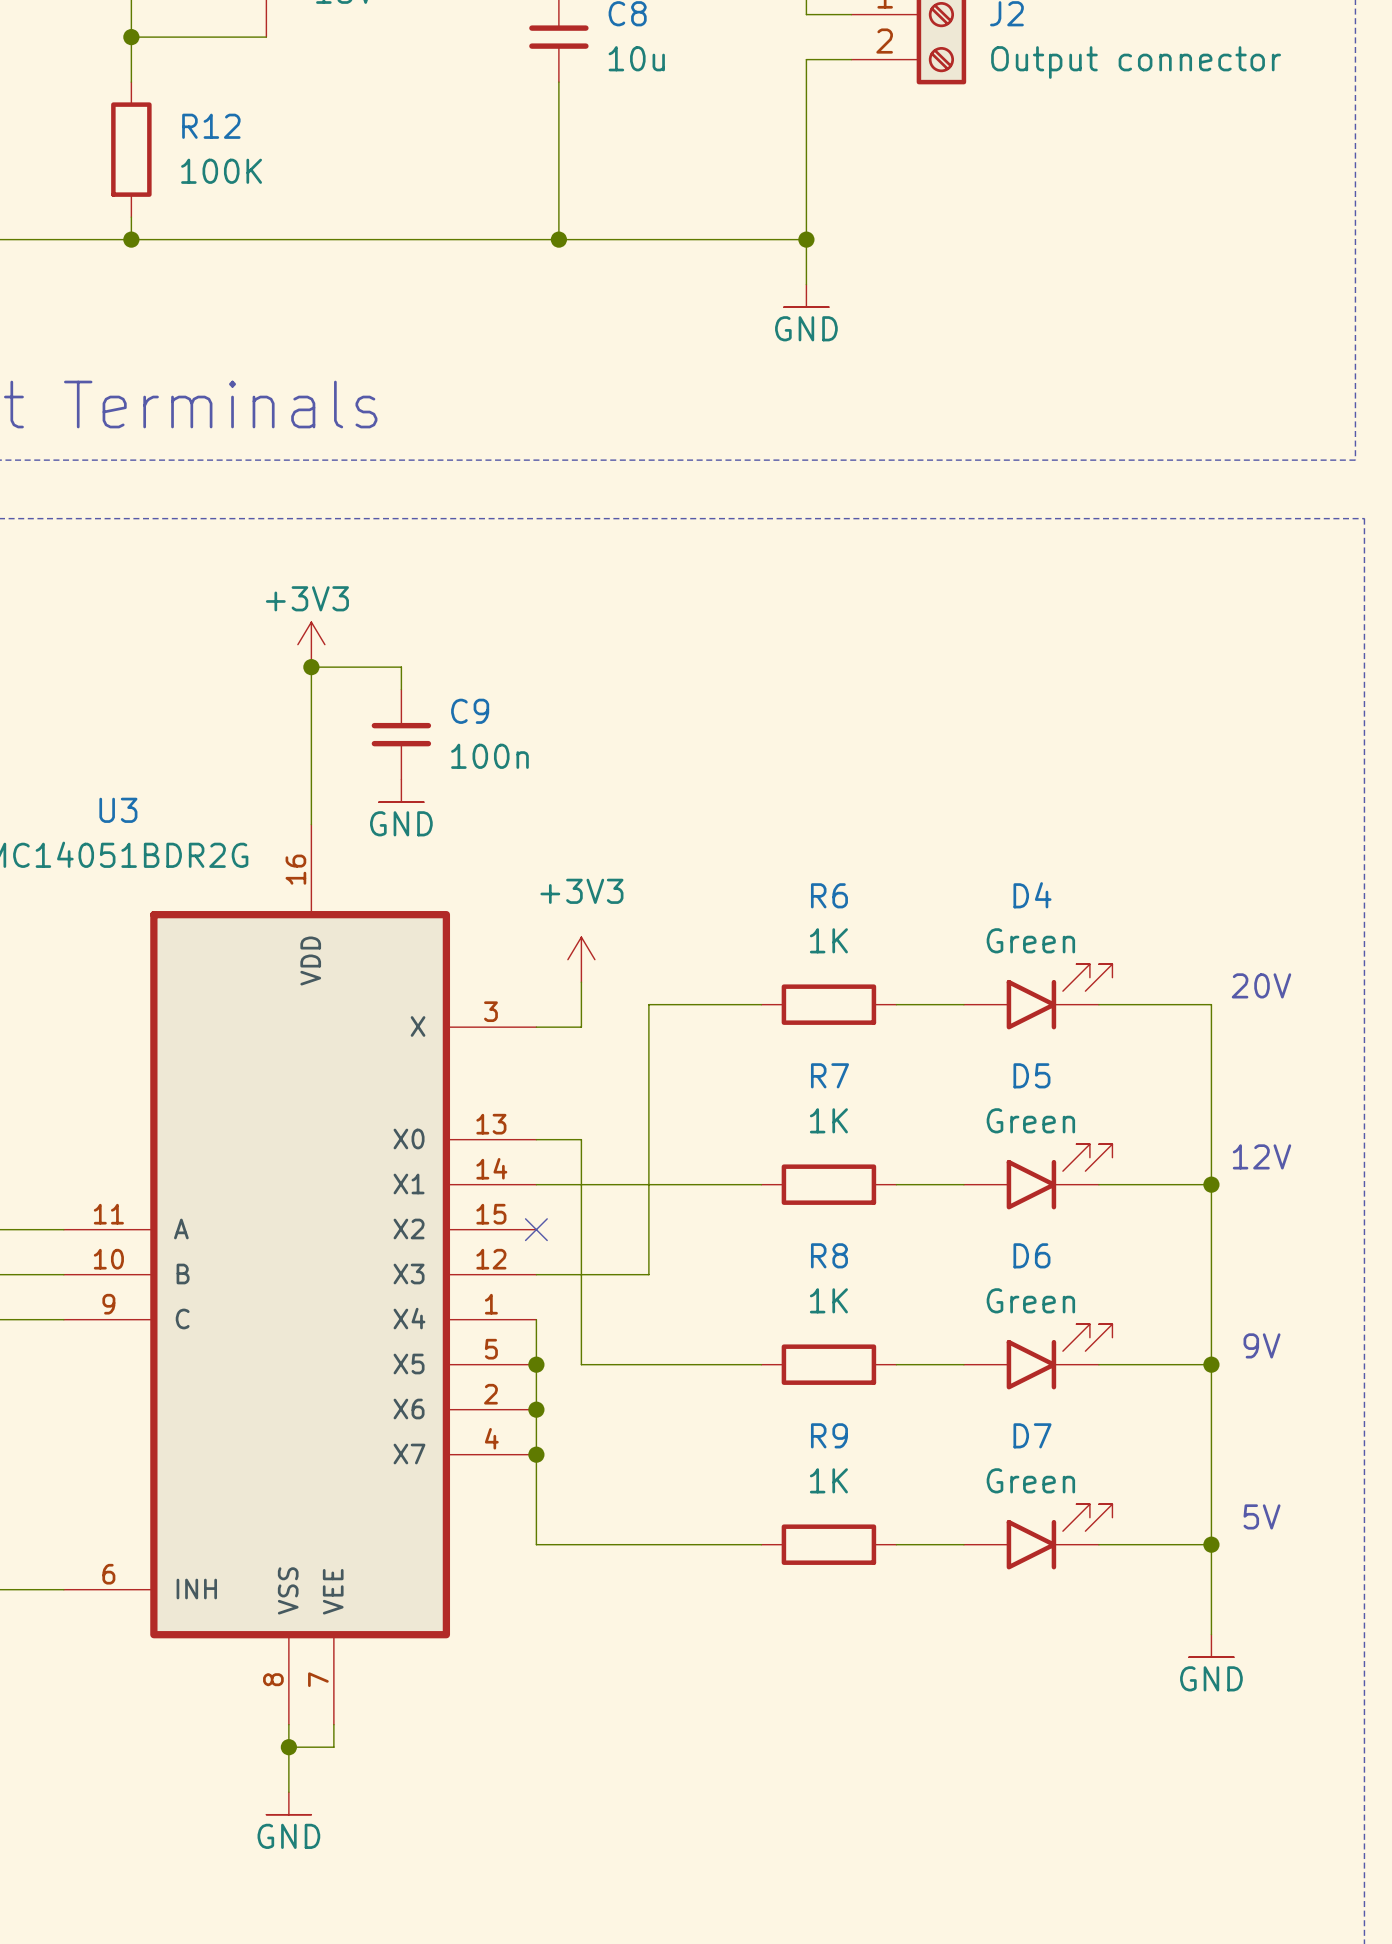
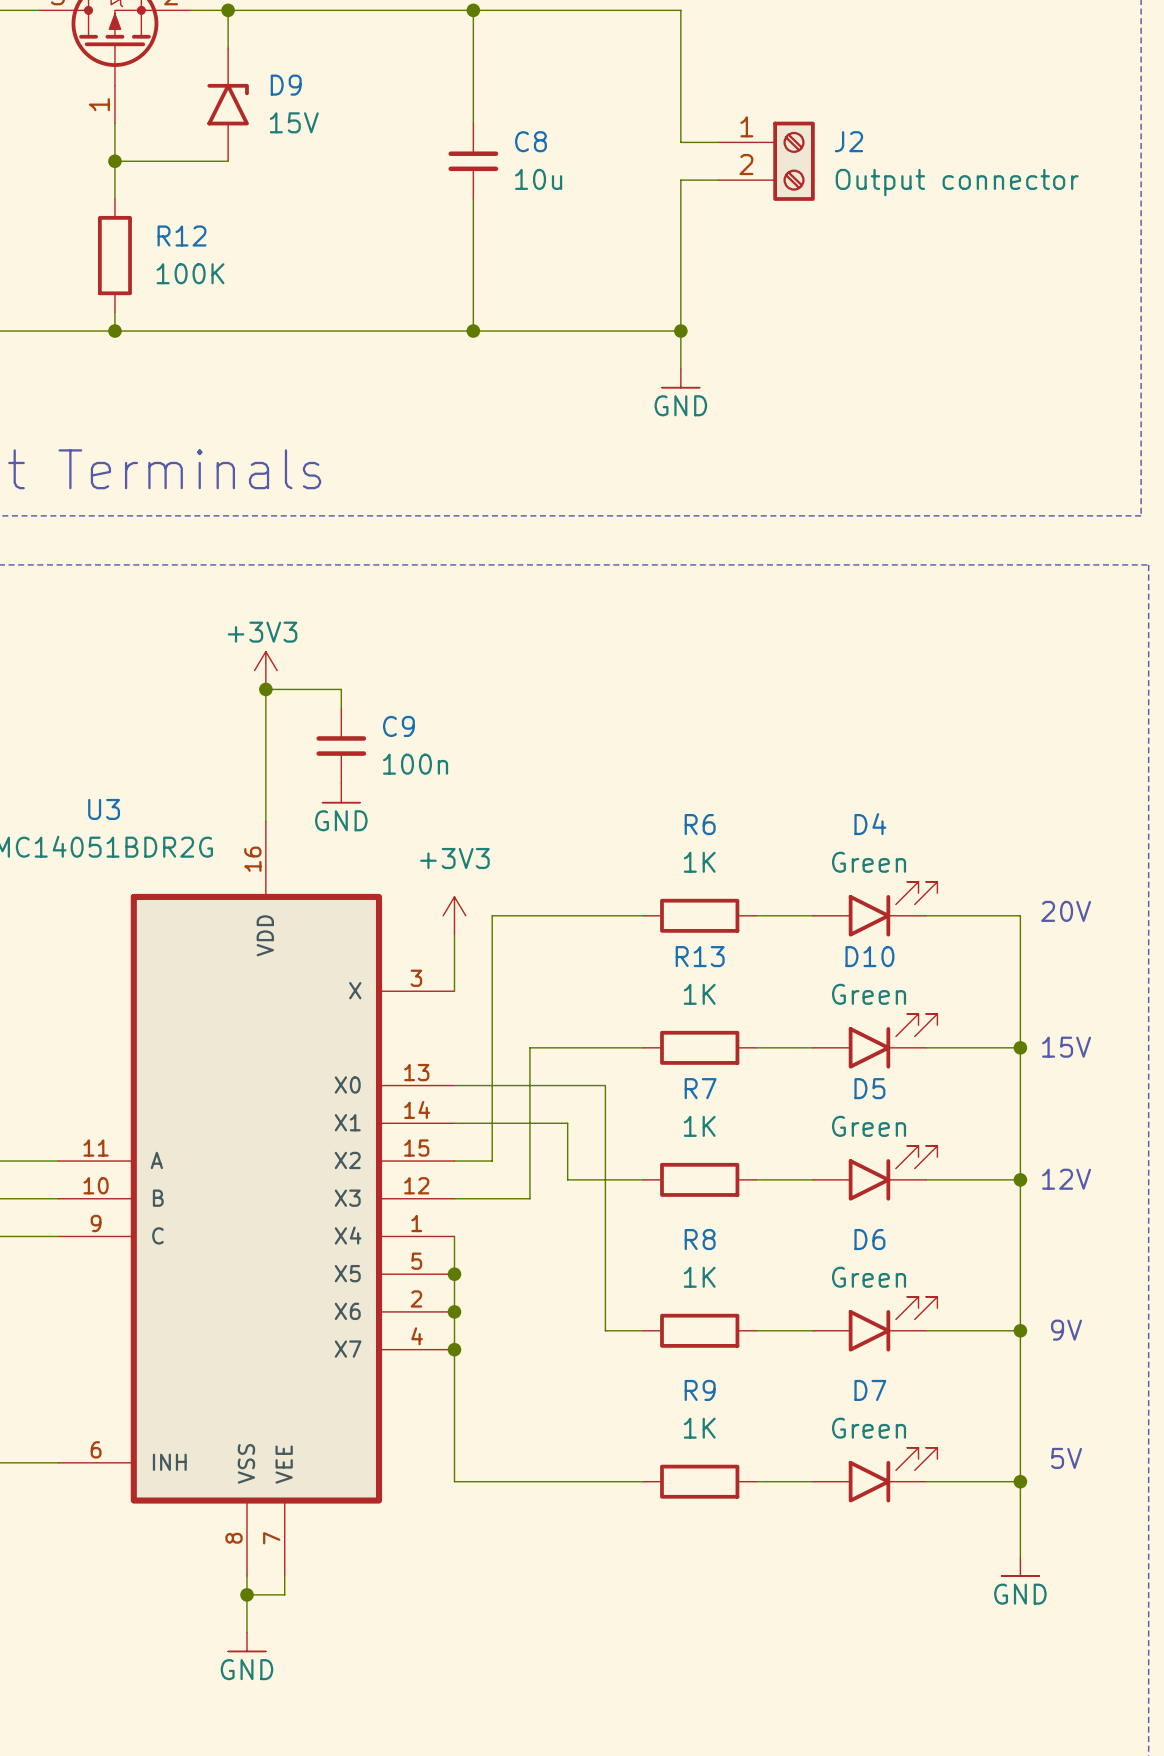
wire: none -> (643, 915) (492, 915) (492, 953)
wire: none -> (756, 915) (812, 915)
power symbol position: +3V3 (581, 959) -> +3V3 (454, 915)
text position: 20V (1261, 985) -> 20V (1066, 911)
D4 position: (1038, 996) -> (875, 909)
wire: (761, 1004) (648, 1004) (648, 1274) (626, 1274) -> (643, 1047) (529, 1047) (529, 1198)
R6 position: (828, 1004) -> (699, 915)
wire: (896, 1004) (963, 1004) -> (756, 1047) (812, 1047)
wire: (1098, 1004) (1211, 1004) -> (926, 915) (1020, 915) (1020, 972)
wire: (536, 1027) (581, 1027) -> (454, 991) (454, 934)
wire: none -> (492, 991) (492, 1085) (605, 1085) (605, 1330) (643, 1330)
D10: none -> Green (875, 1041)
text: none -> 15V (1066, 1047)
R13: none -> 1K (699, 1047)
wire: none -> (926, 1047) (1020, 1047)
junction: none -> (1020, 1047)
text position: 12V (1262, 1156) -> 12V (1066, 1179)
D5 position: (1038, 1176) -> (875, 1173)
wire: (671, 1184) (761, 1184) -> (567, 1123) (567, 1179) (643, 1179)
R7 position: (828, 1184) -> (699, 1179)
wire: (896, 1184) (963, 1184) -> (756, 1179) (812, 1179)
wire: (1098, 1184) (1211, 1184) -> (926, 1179) (1020, 1179)
junction: (1211, 1184) -> none
no-connect mark: (536, 1229) -> none
wire: (581, 1229) (581, 1364) (761, 1364) -> (492, 1161) (454, 1161)
junction: none -> (1020, 1179)
text position: 9V (1262, 1345) -> 9V (1066, 1330)
D6 position: (1038, 1356) -> (875, 1324)
R8 position: (828, 1364) -> (699, 1330)
wire: (896, 1364) (963, 1364) -> (756, 1330) (812, 1330)
wire: (1098, 1364) (1211, 1364) -> (926, 1330) (1020, 1330)
junction: (1211, 1364) -> none
junction: none -> (1020, 1330)
text position: 5V (1262, 1516) -> 5V (1066, 1458)
D7 position: (1038, 1536) -> (875, 1475)
wire: (536, 1544) (761, 1544) -> (454, 1425) (454, 1481) (643, 1481)
R9 position: (828, 1544) -> (699, 1481)
wire: (896, 1544) (963, 1544) -> (756, 1481) (812, 1481)
wire: (1098, 1544) (1211, 1544) -> (926, 1481) (1020, 1481)
junction: (1211, 1544) -> none
junction: none -> (1020, 1481)
wire: none -> (1020, 1500) (1020, 1557)
power symbol position: GND (1211, 1645) -> GND (1020, 1566)

